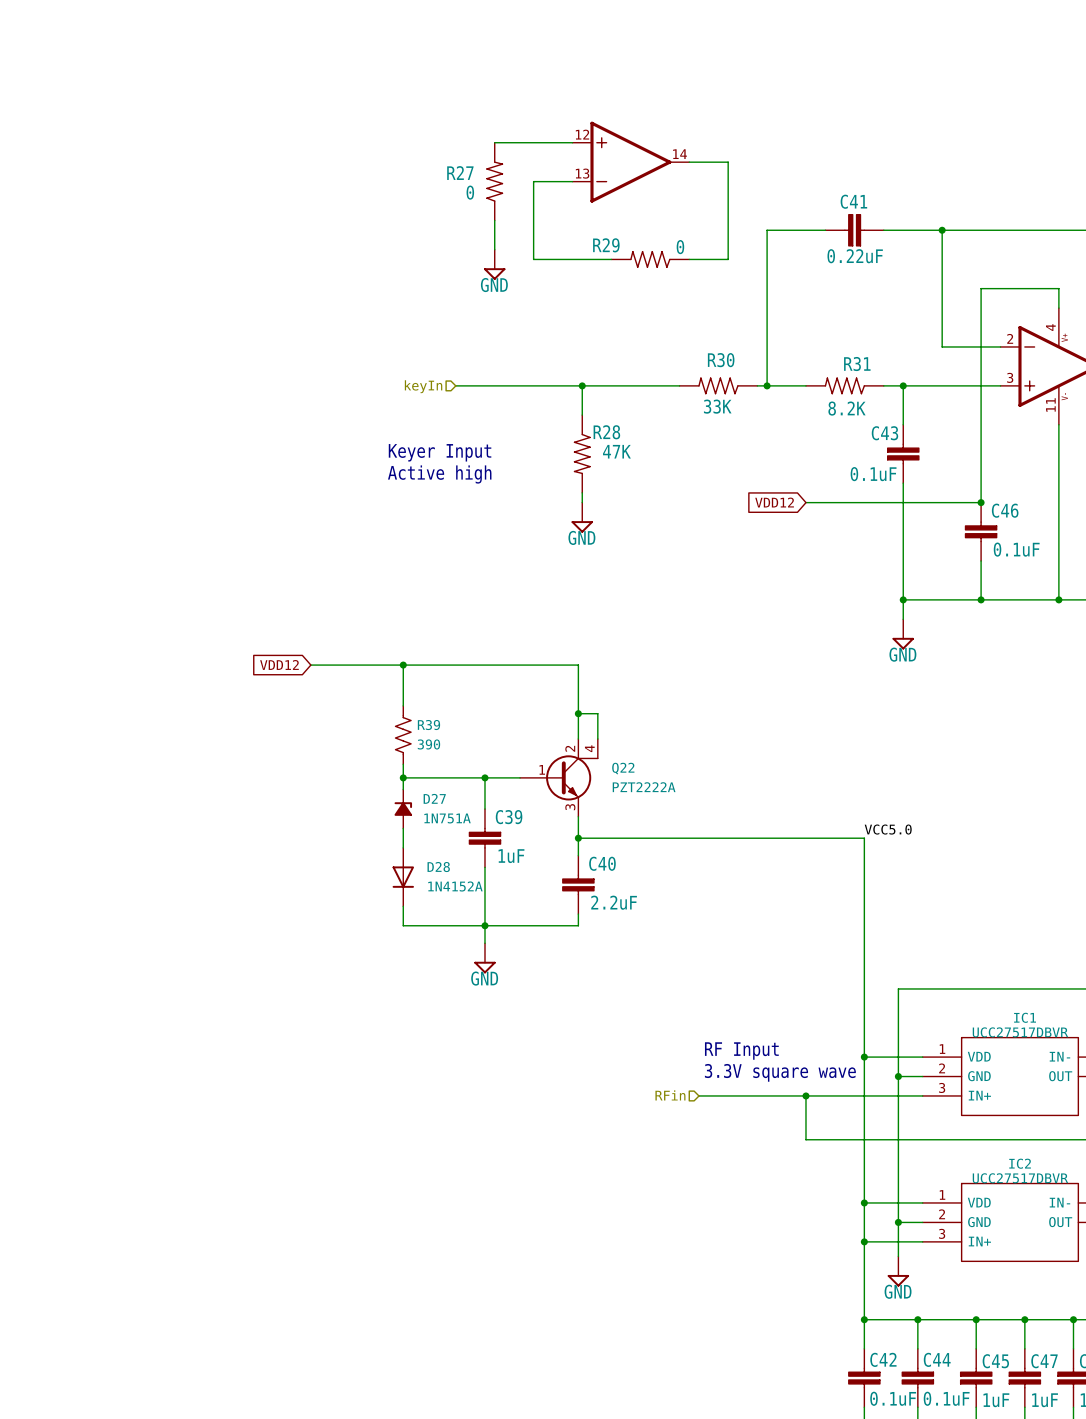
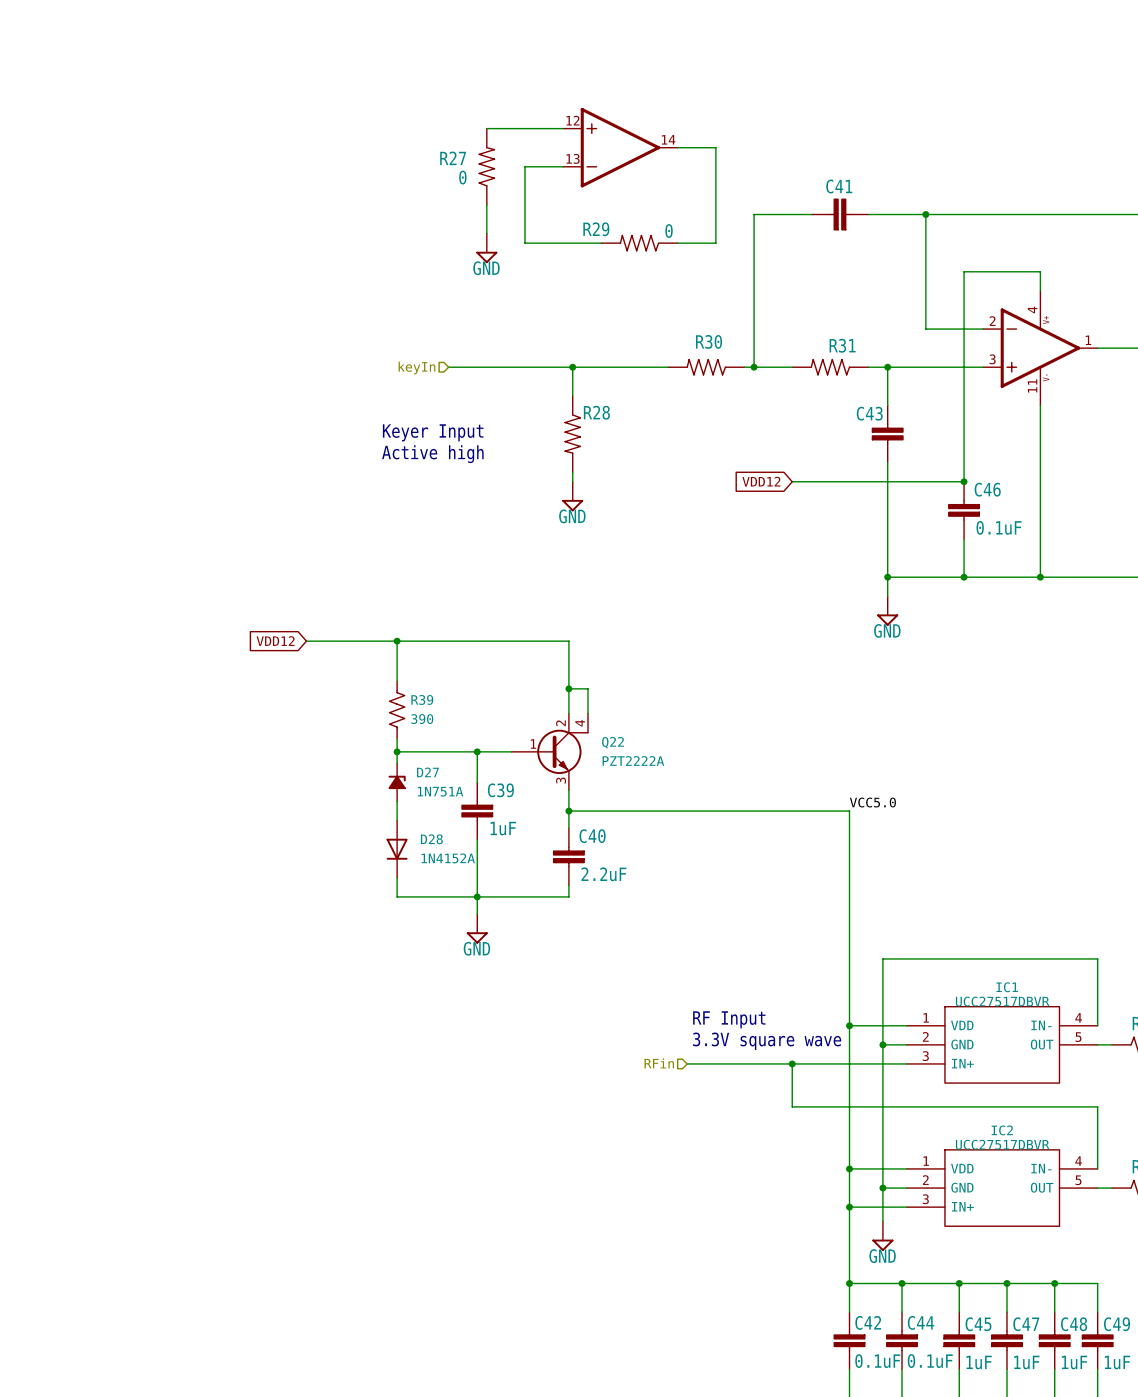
C41 value: 0.22uF (855, 256) -> none
R30 value: 33K (717, 406) -> none
R31 value: 8.2K (846, 408) -> none
R28 value: 47K (616, 451) -> none
C43 value: 0.1uF (873, 474) -> none

